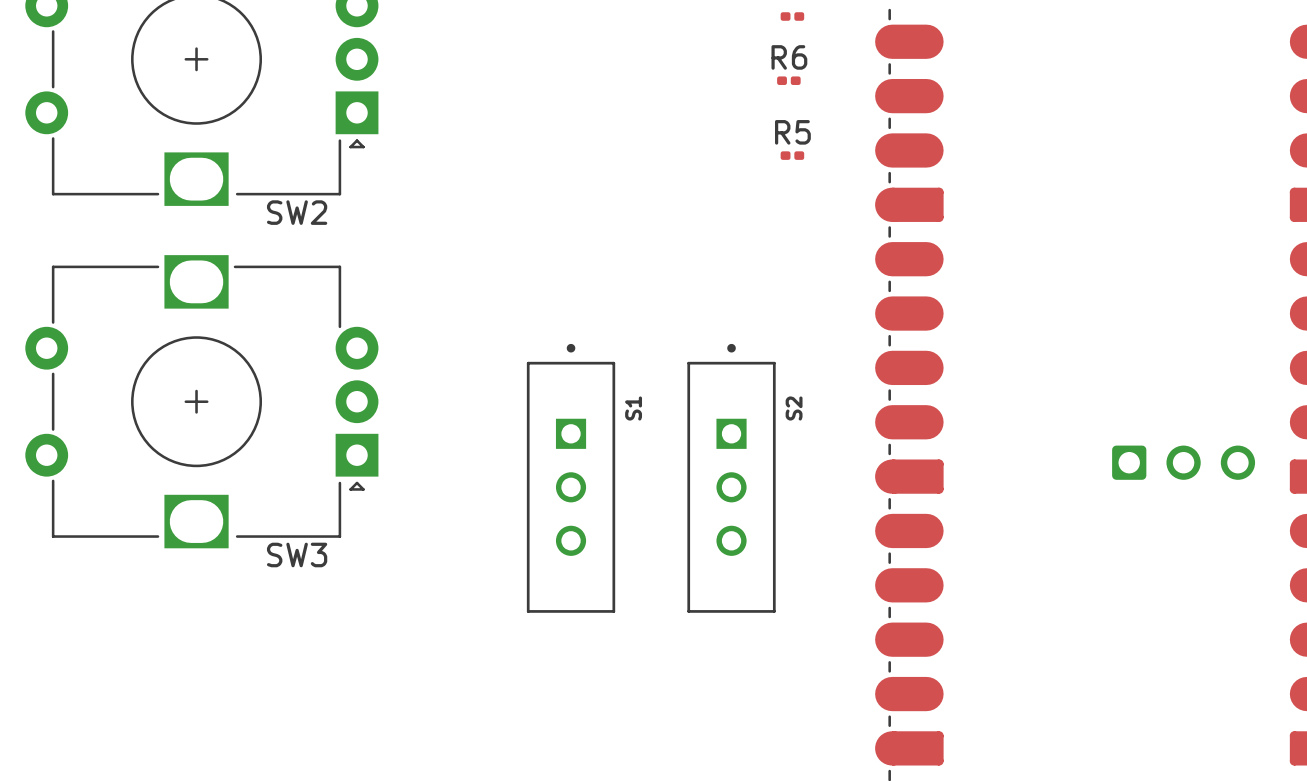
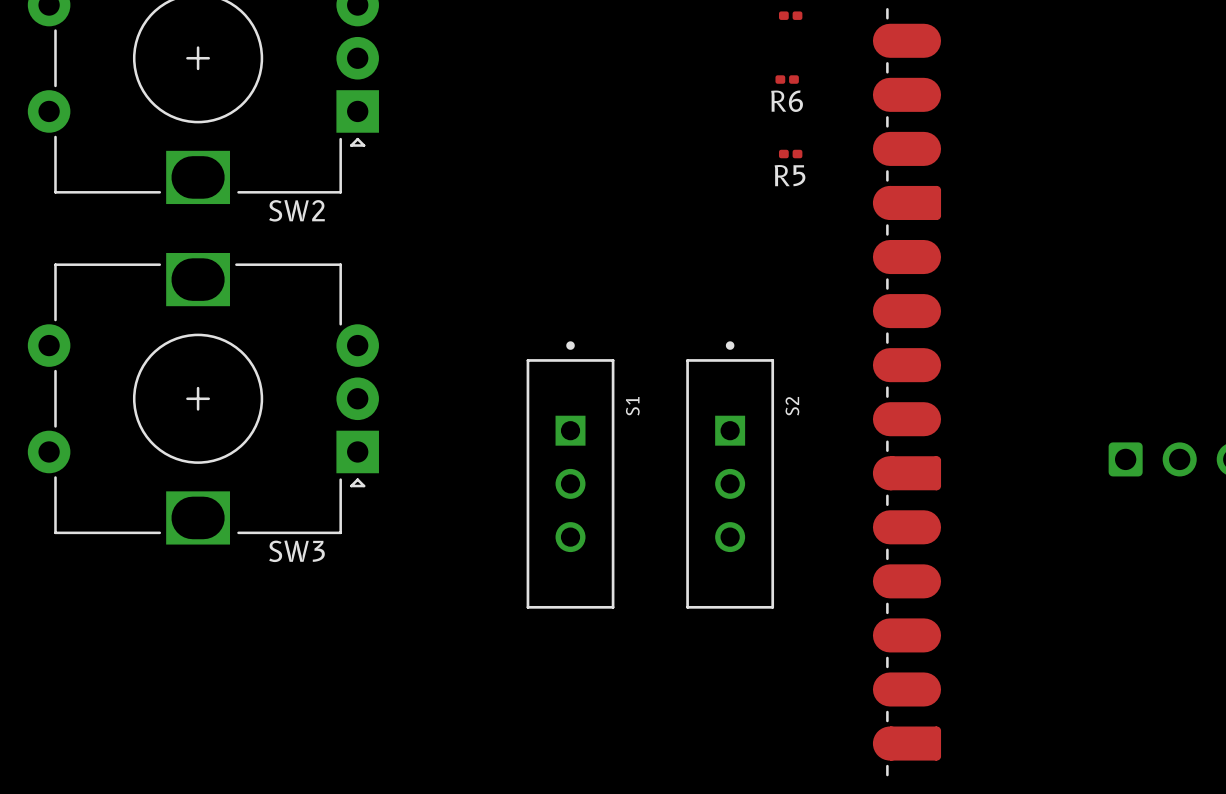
R6 name position: R6 (789, 57) -> R6 (787, 101)
R5 name position: R5 (792, 132) -> R5 (790, 175)

